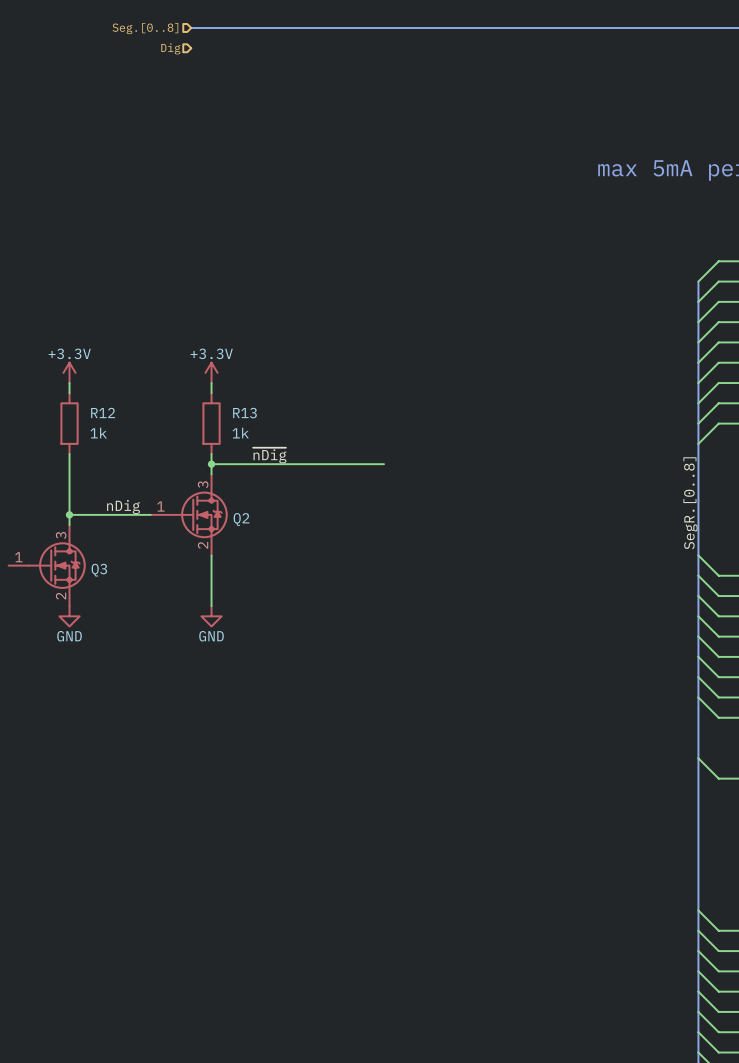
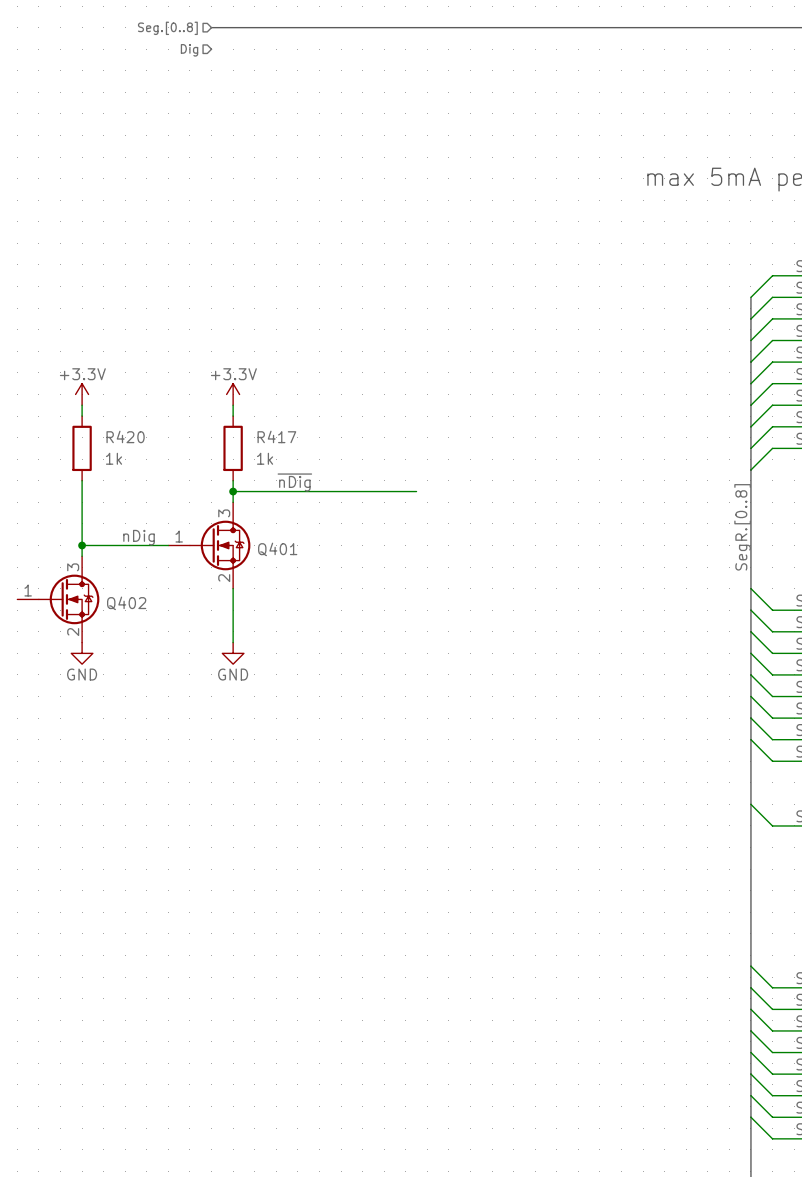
R12 name: R12 (103, 412) -> R420 (125, 436)
R13 name: R13 (244, 413) -> R417 (276, 436)
Q2 name: Q2 (241, 519) -> Q401 (277, 549)
Q3 name: Q3 (99, 570) -> Q402 (126, 603)

